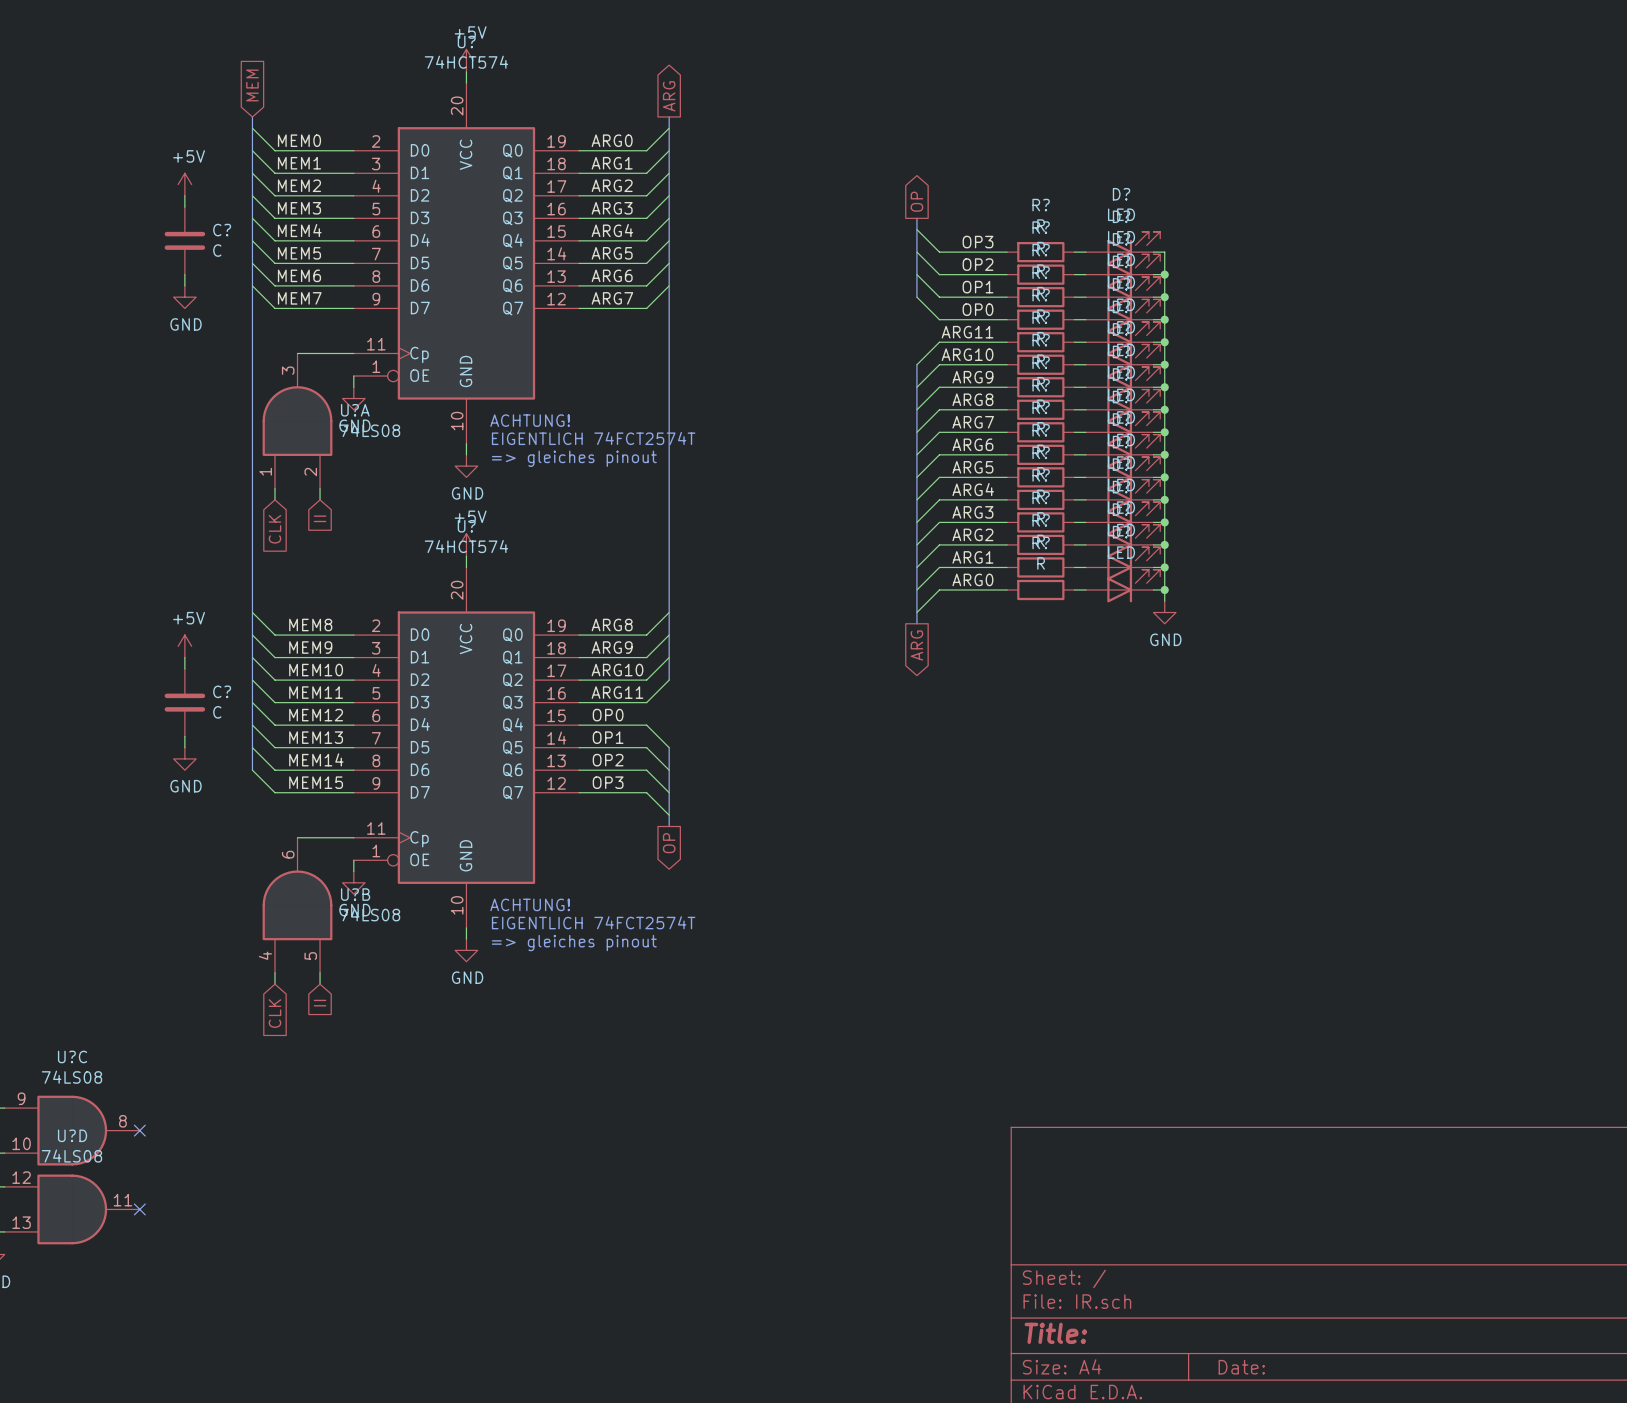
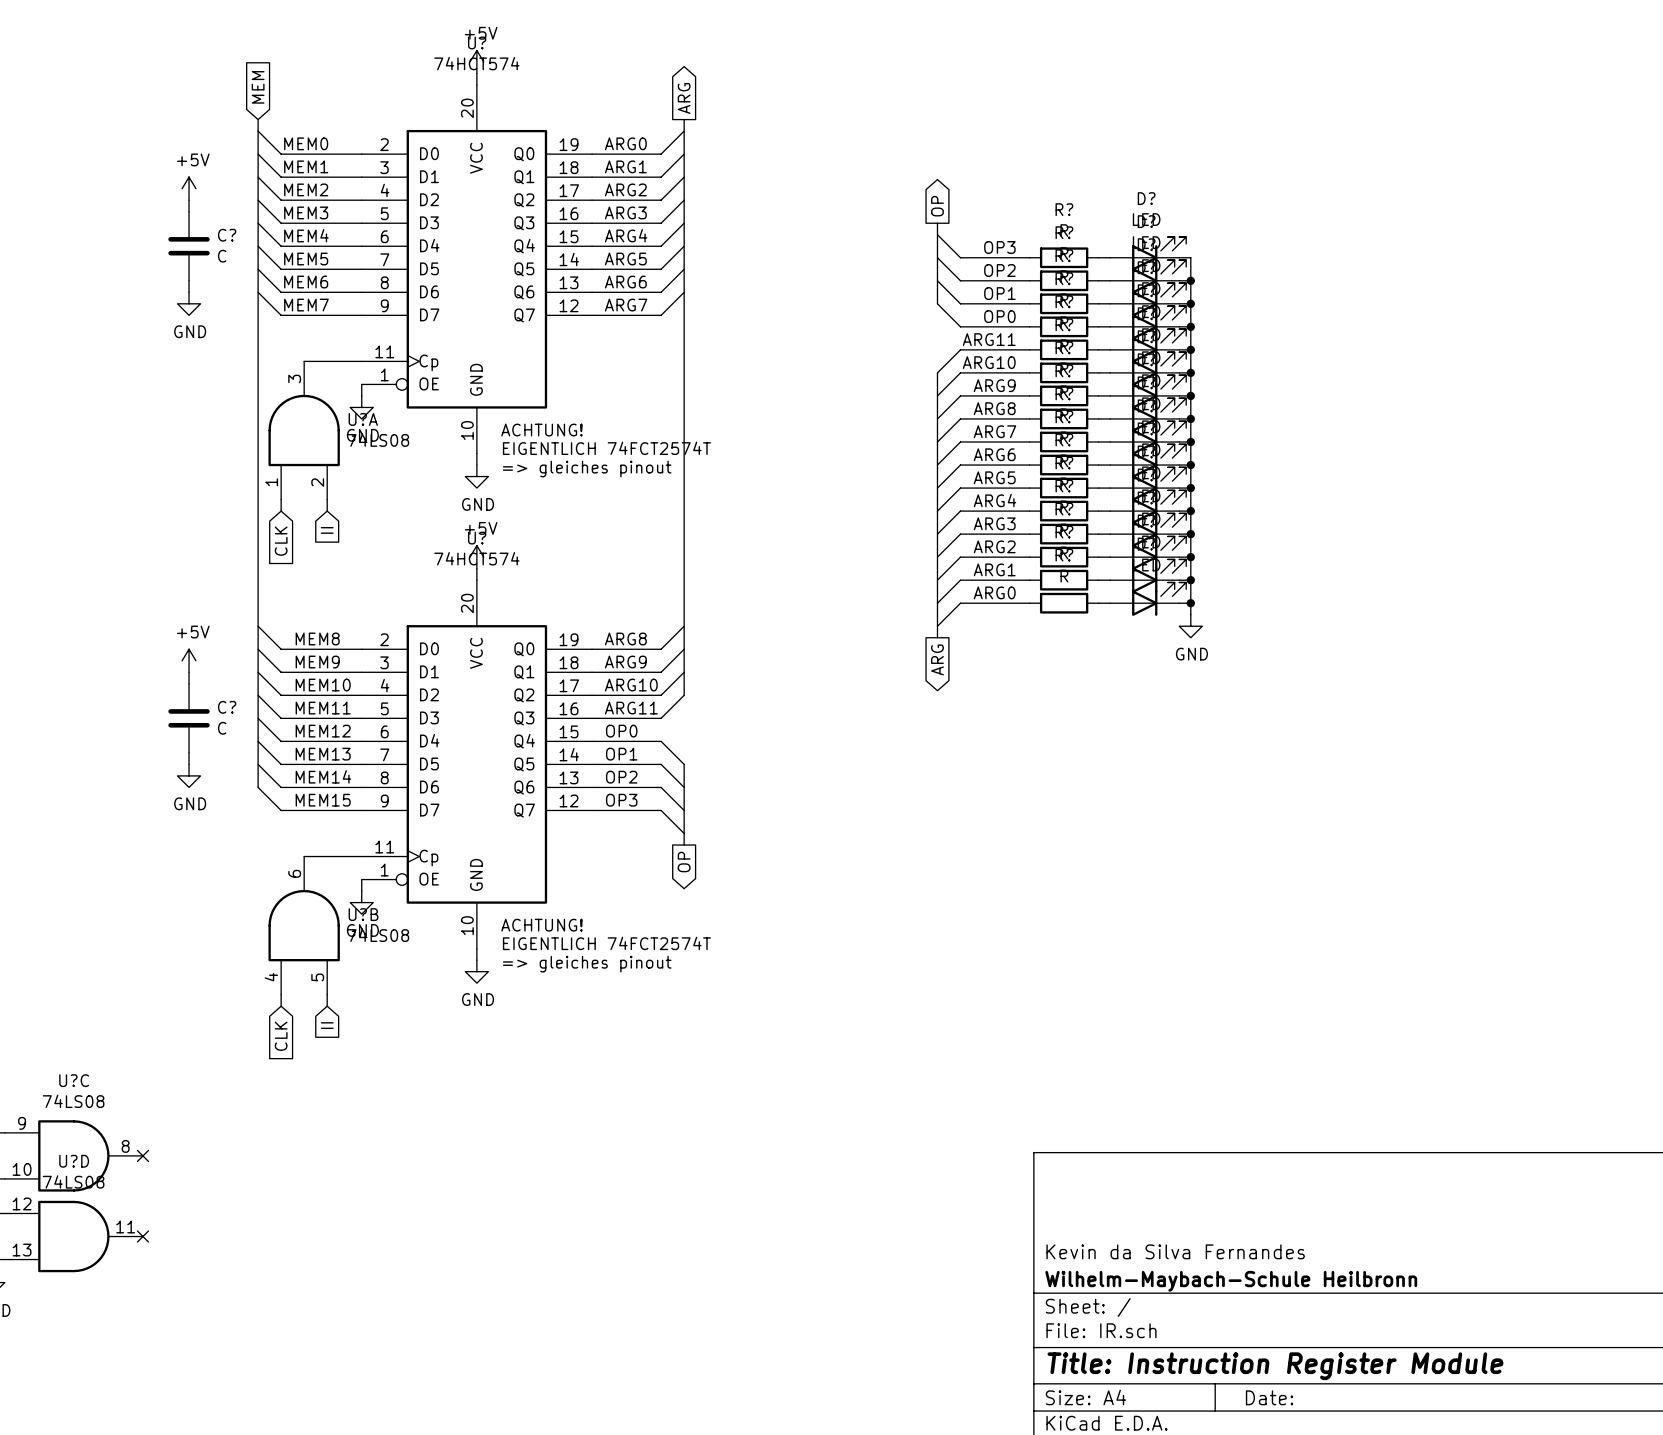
title block: none -> Kevin da Silva Fernandes (1175, 1251)
title block: none -> Wilhelm-Maybach-Schule Heilbronn (1231, 1281)
title block: Title: (1055, 1333) -> Title: Instruction Register Module (1275, 1366)

